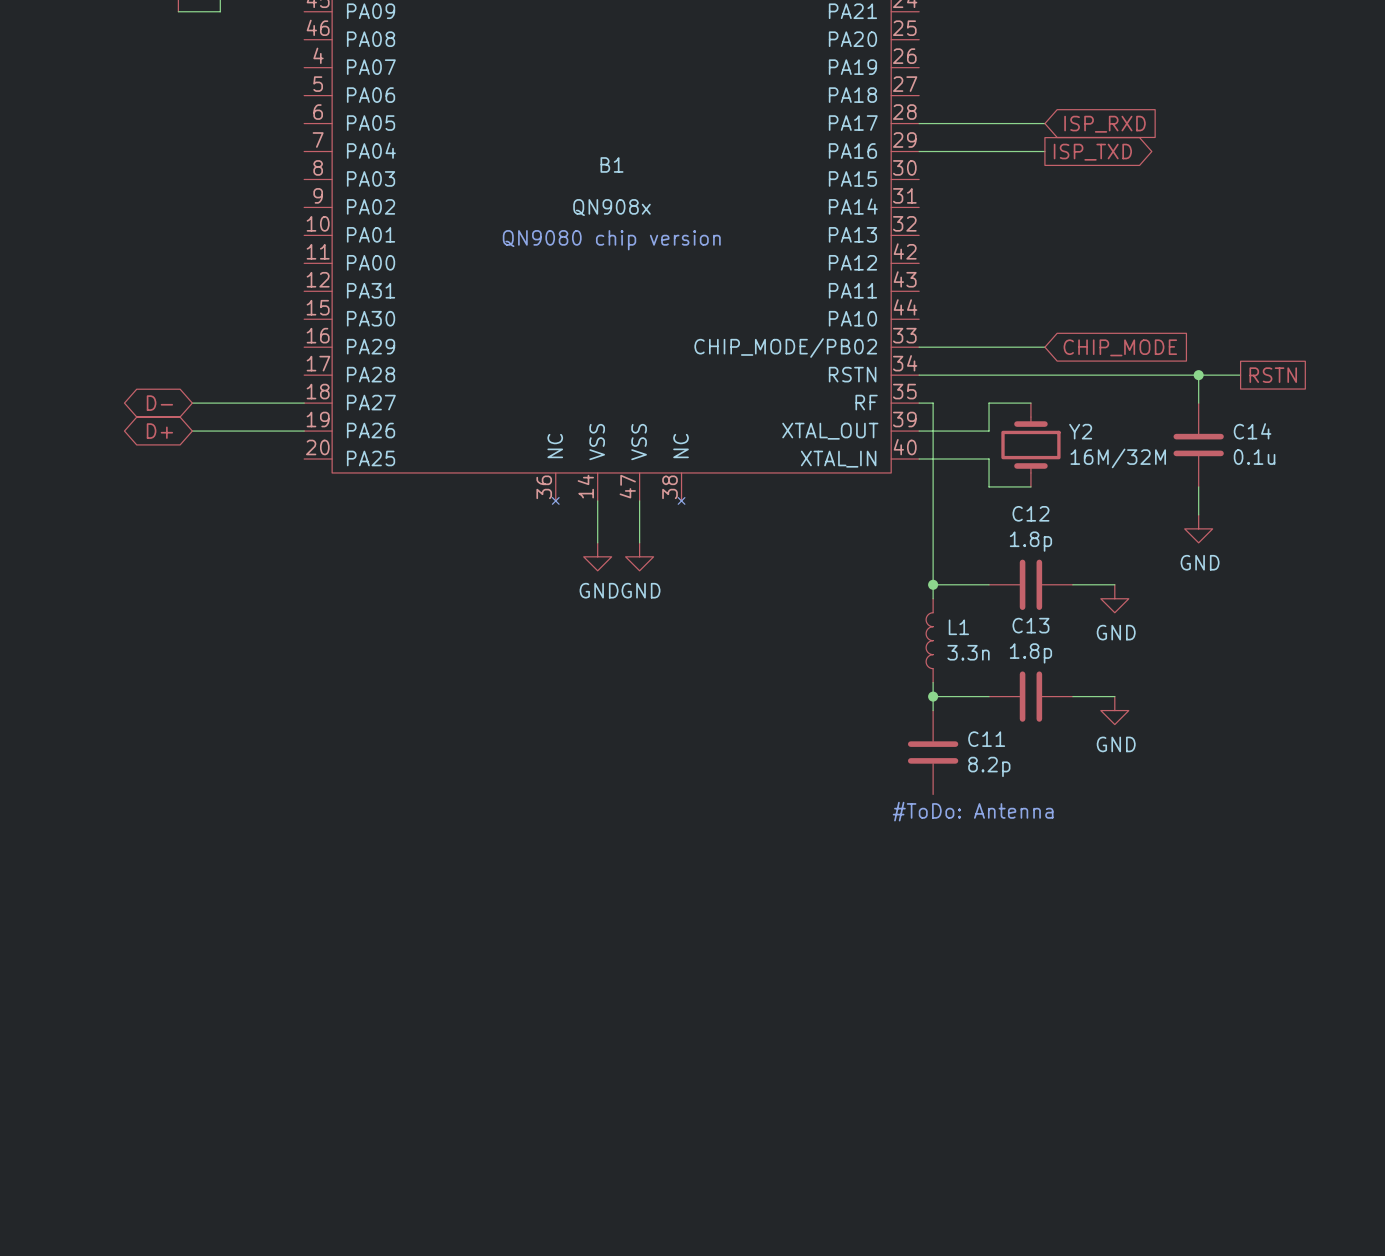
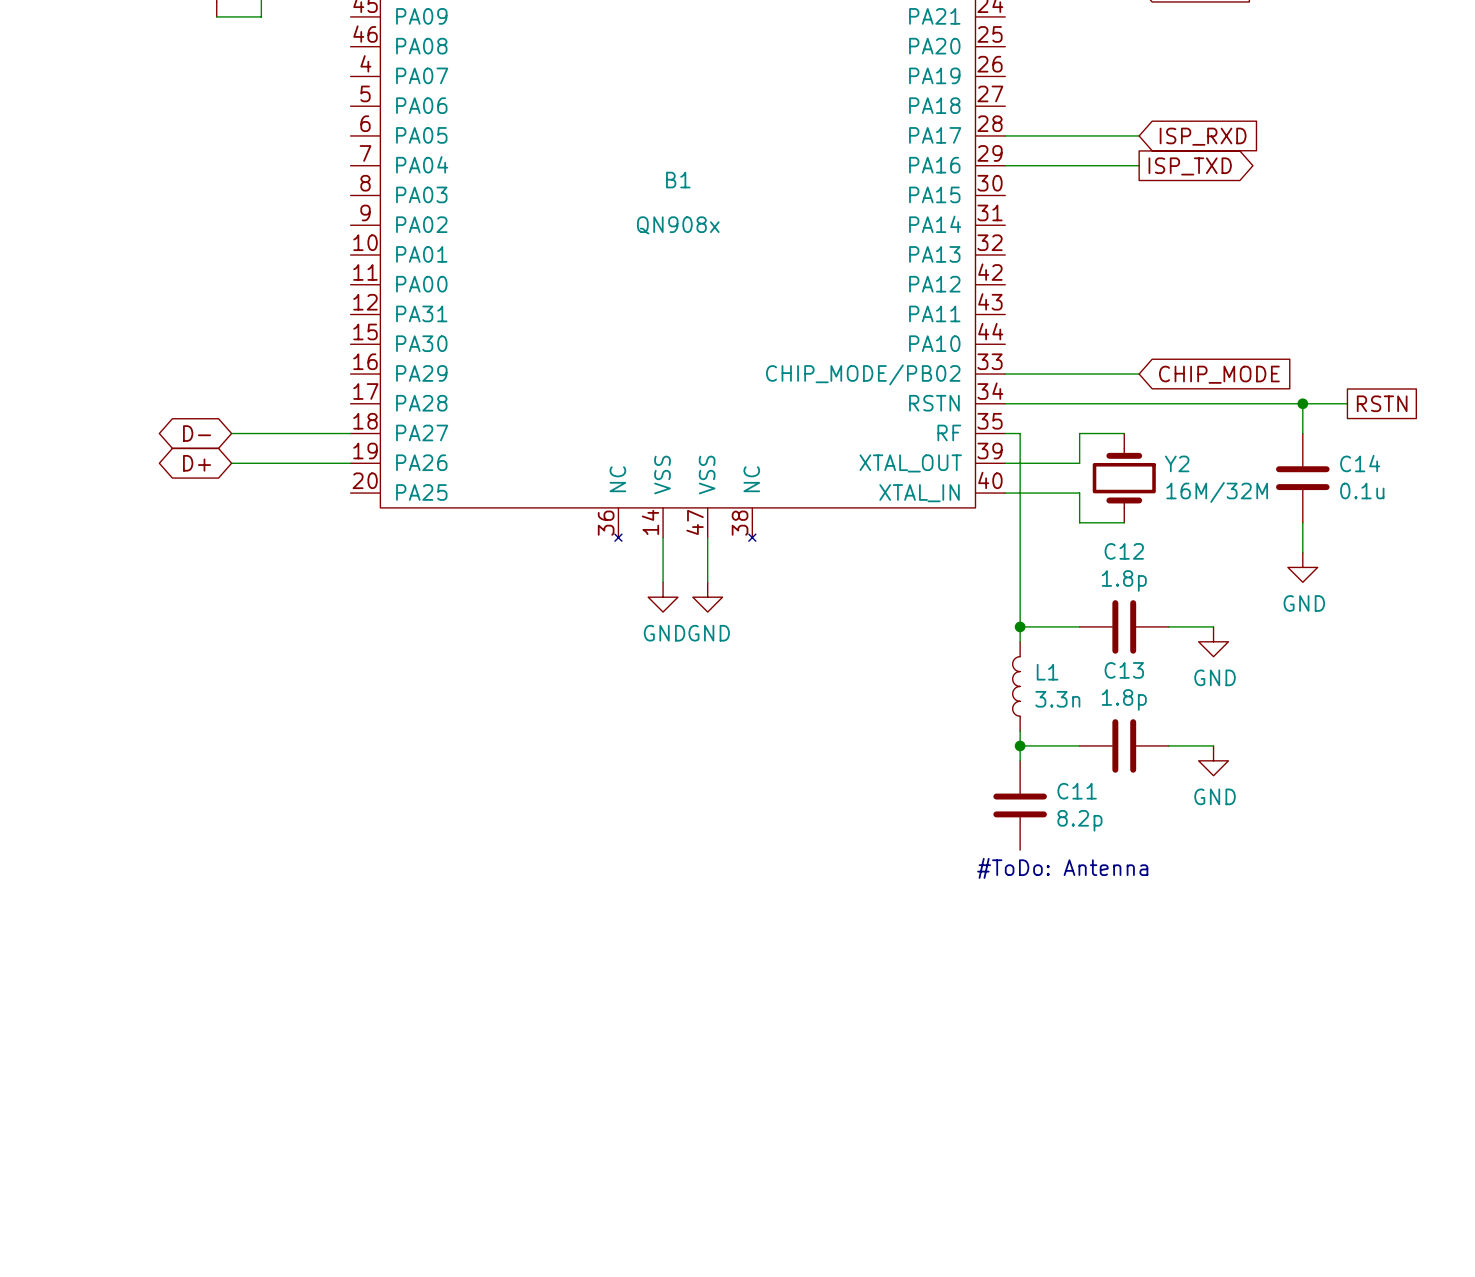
text: QN9080 chip version (611, 240) -> none

